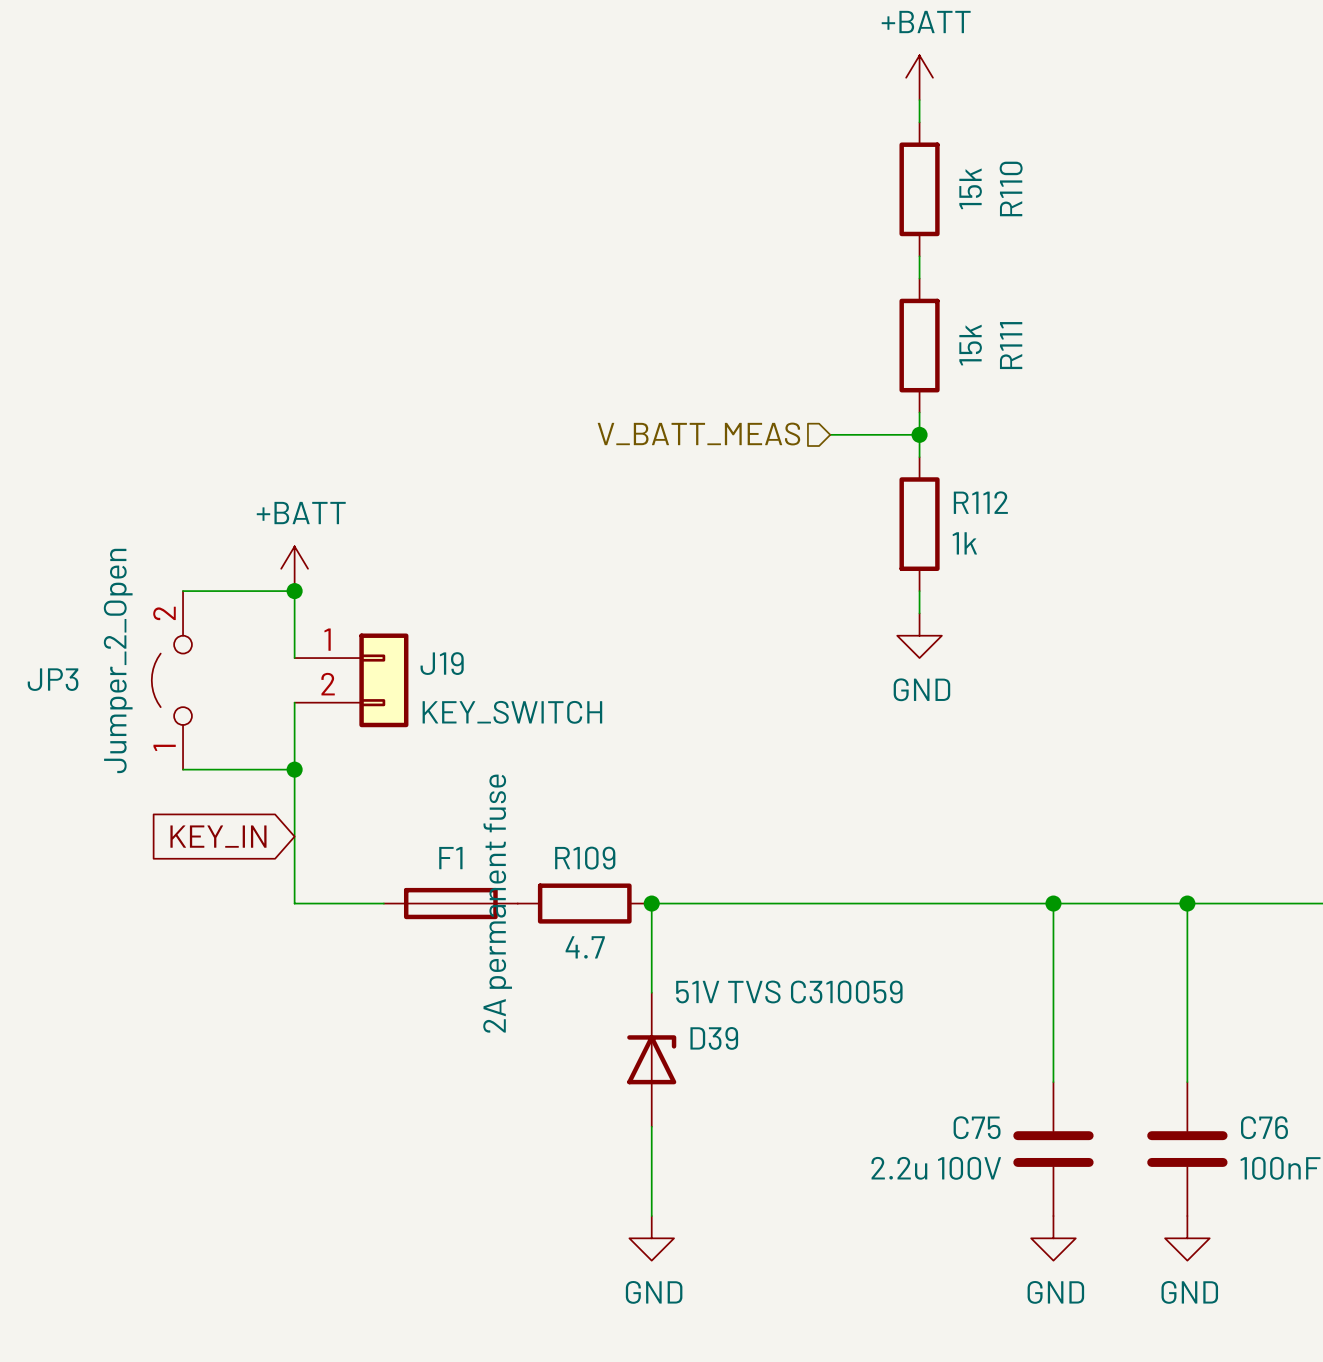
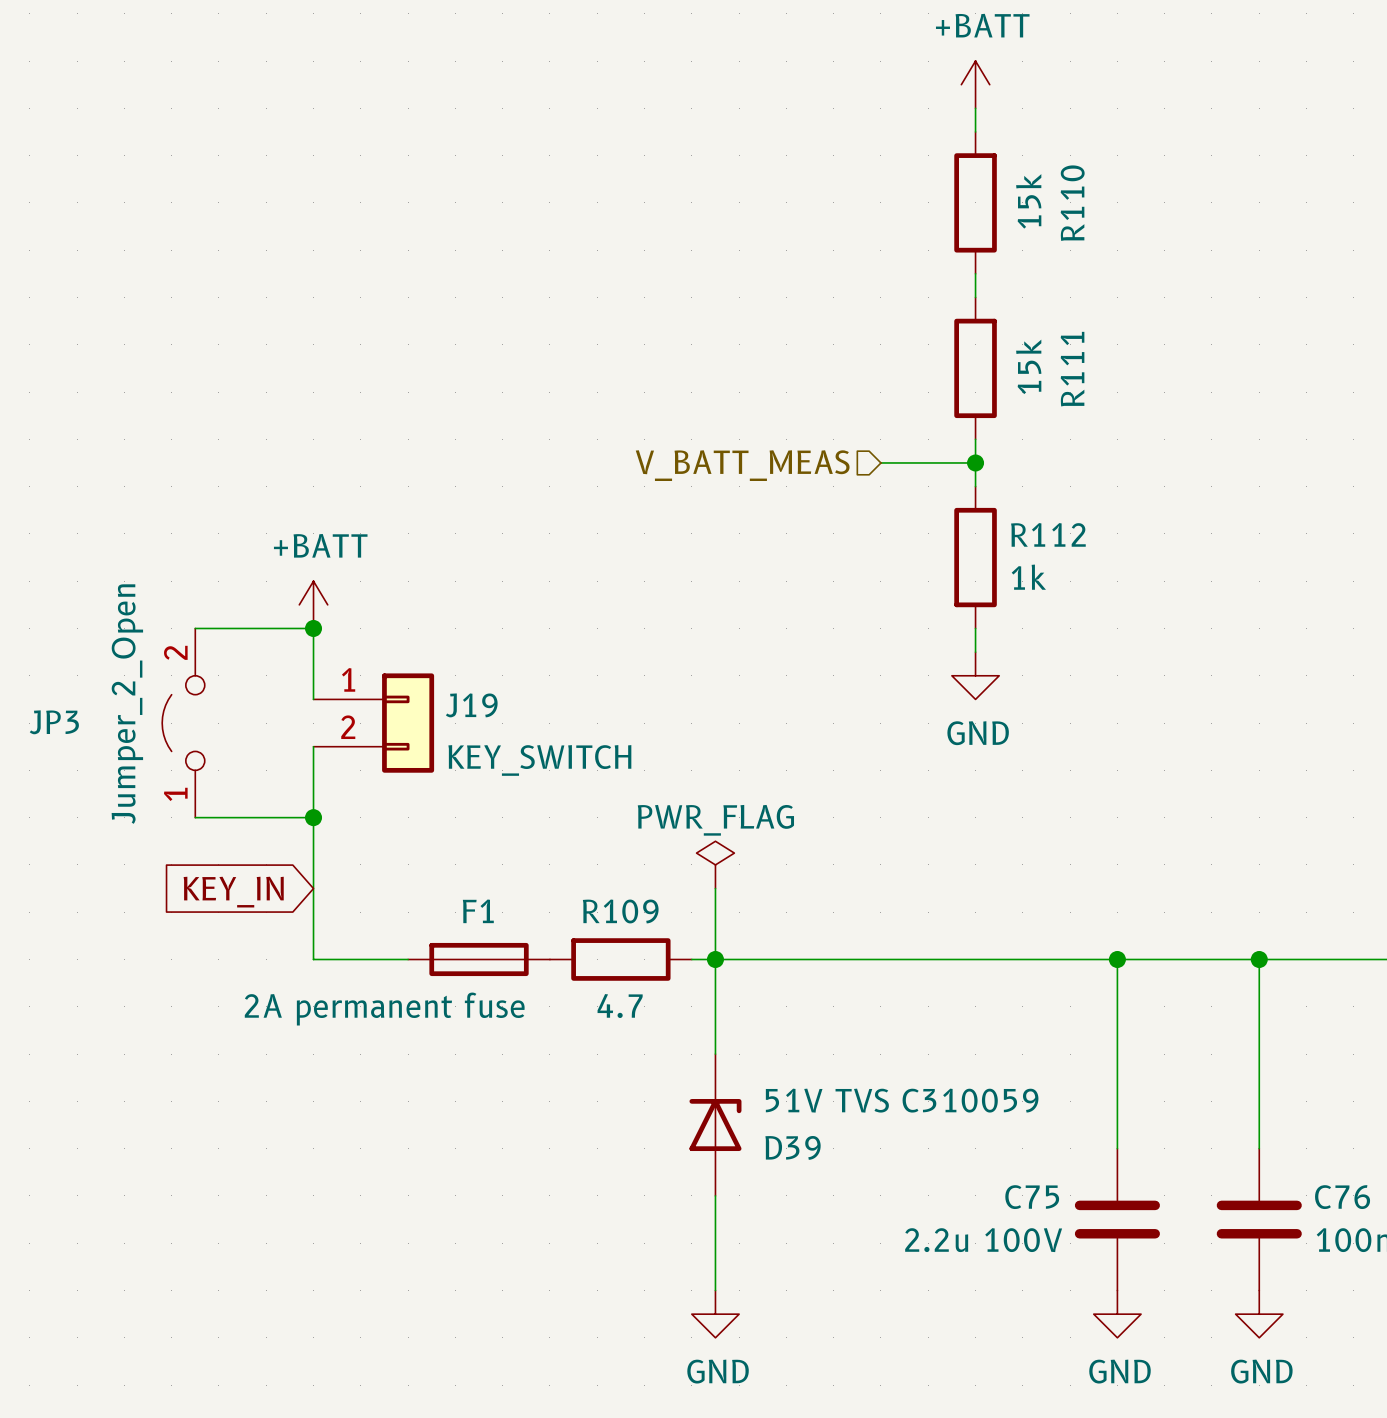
power symbol: none -> PWR_FLAG (715, 864)
wire: none -> (715, 888) (715, 1054)
F1 value rotation: 0° (497, 903) -> 90° clockwise (384, 1009)
wire: (651, 903) (651, 992) -> none
junction position: (651, 903) -> (715, 959)
D39 value position: 51V TVS C310059 (789, 992) -> 51V TVS C310059 (902, 1100)
D39 name position: D39 (714, 1038) -> D39 (793, 1147)
D39 position: (651, 1059) -> (715, 1125)
wire: (651, 1126) (651, 1216) -> (715, 1195) (715, 1290)
power symbol position: GND (651, 1238) -> GND (715, 1314)

